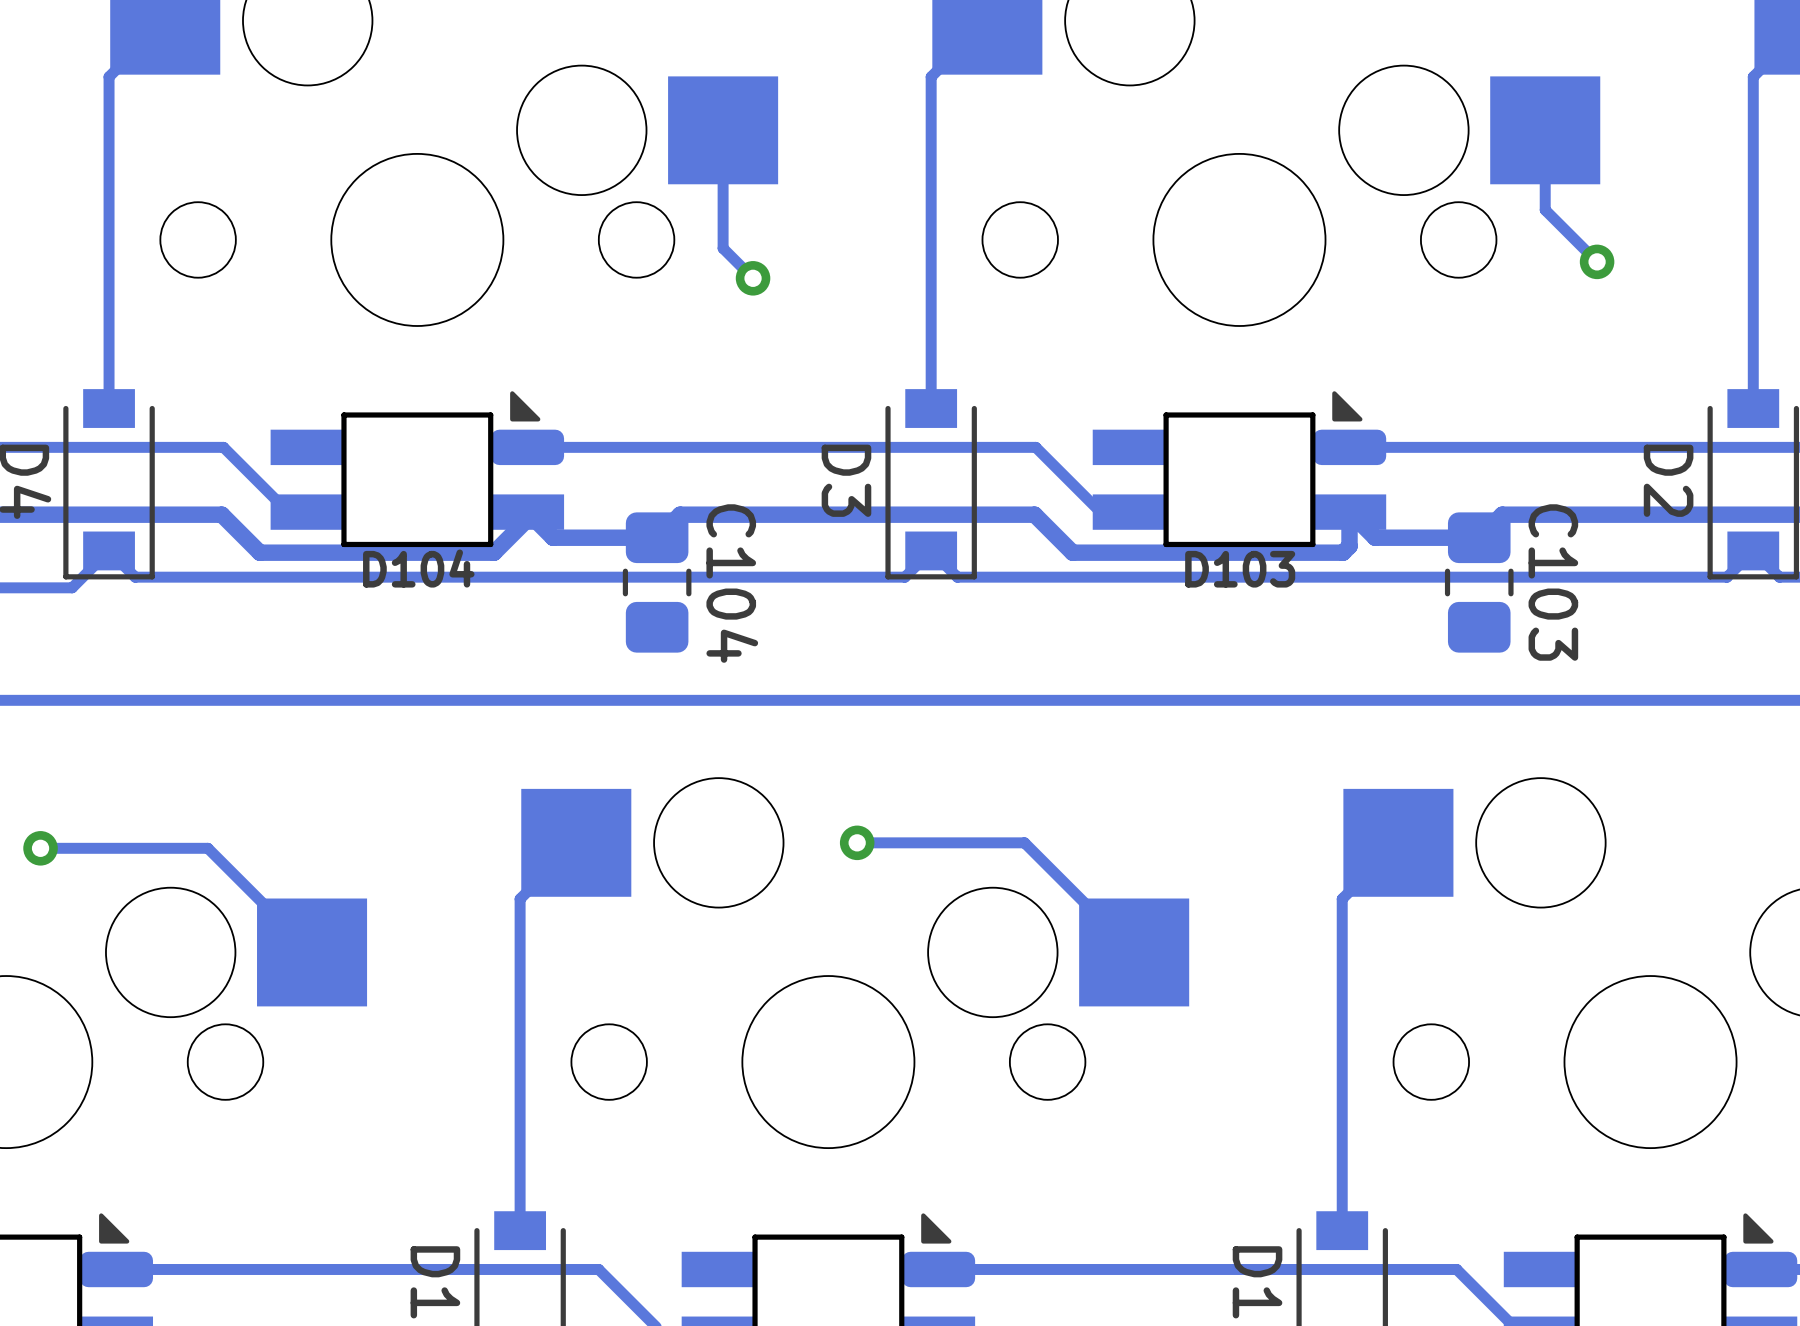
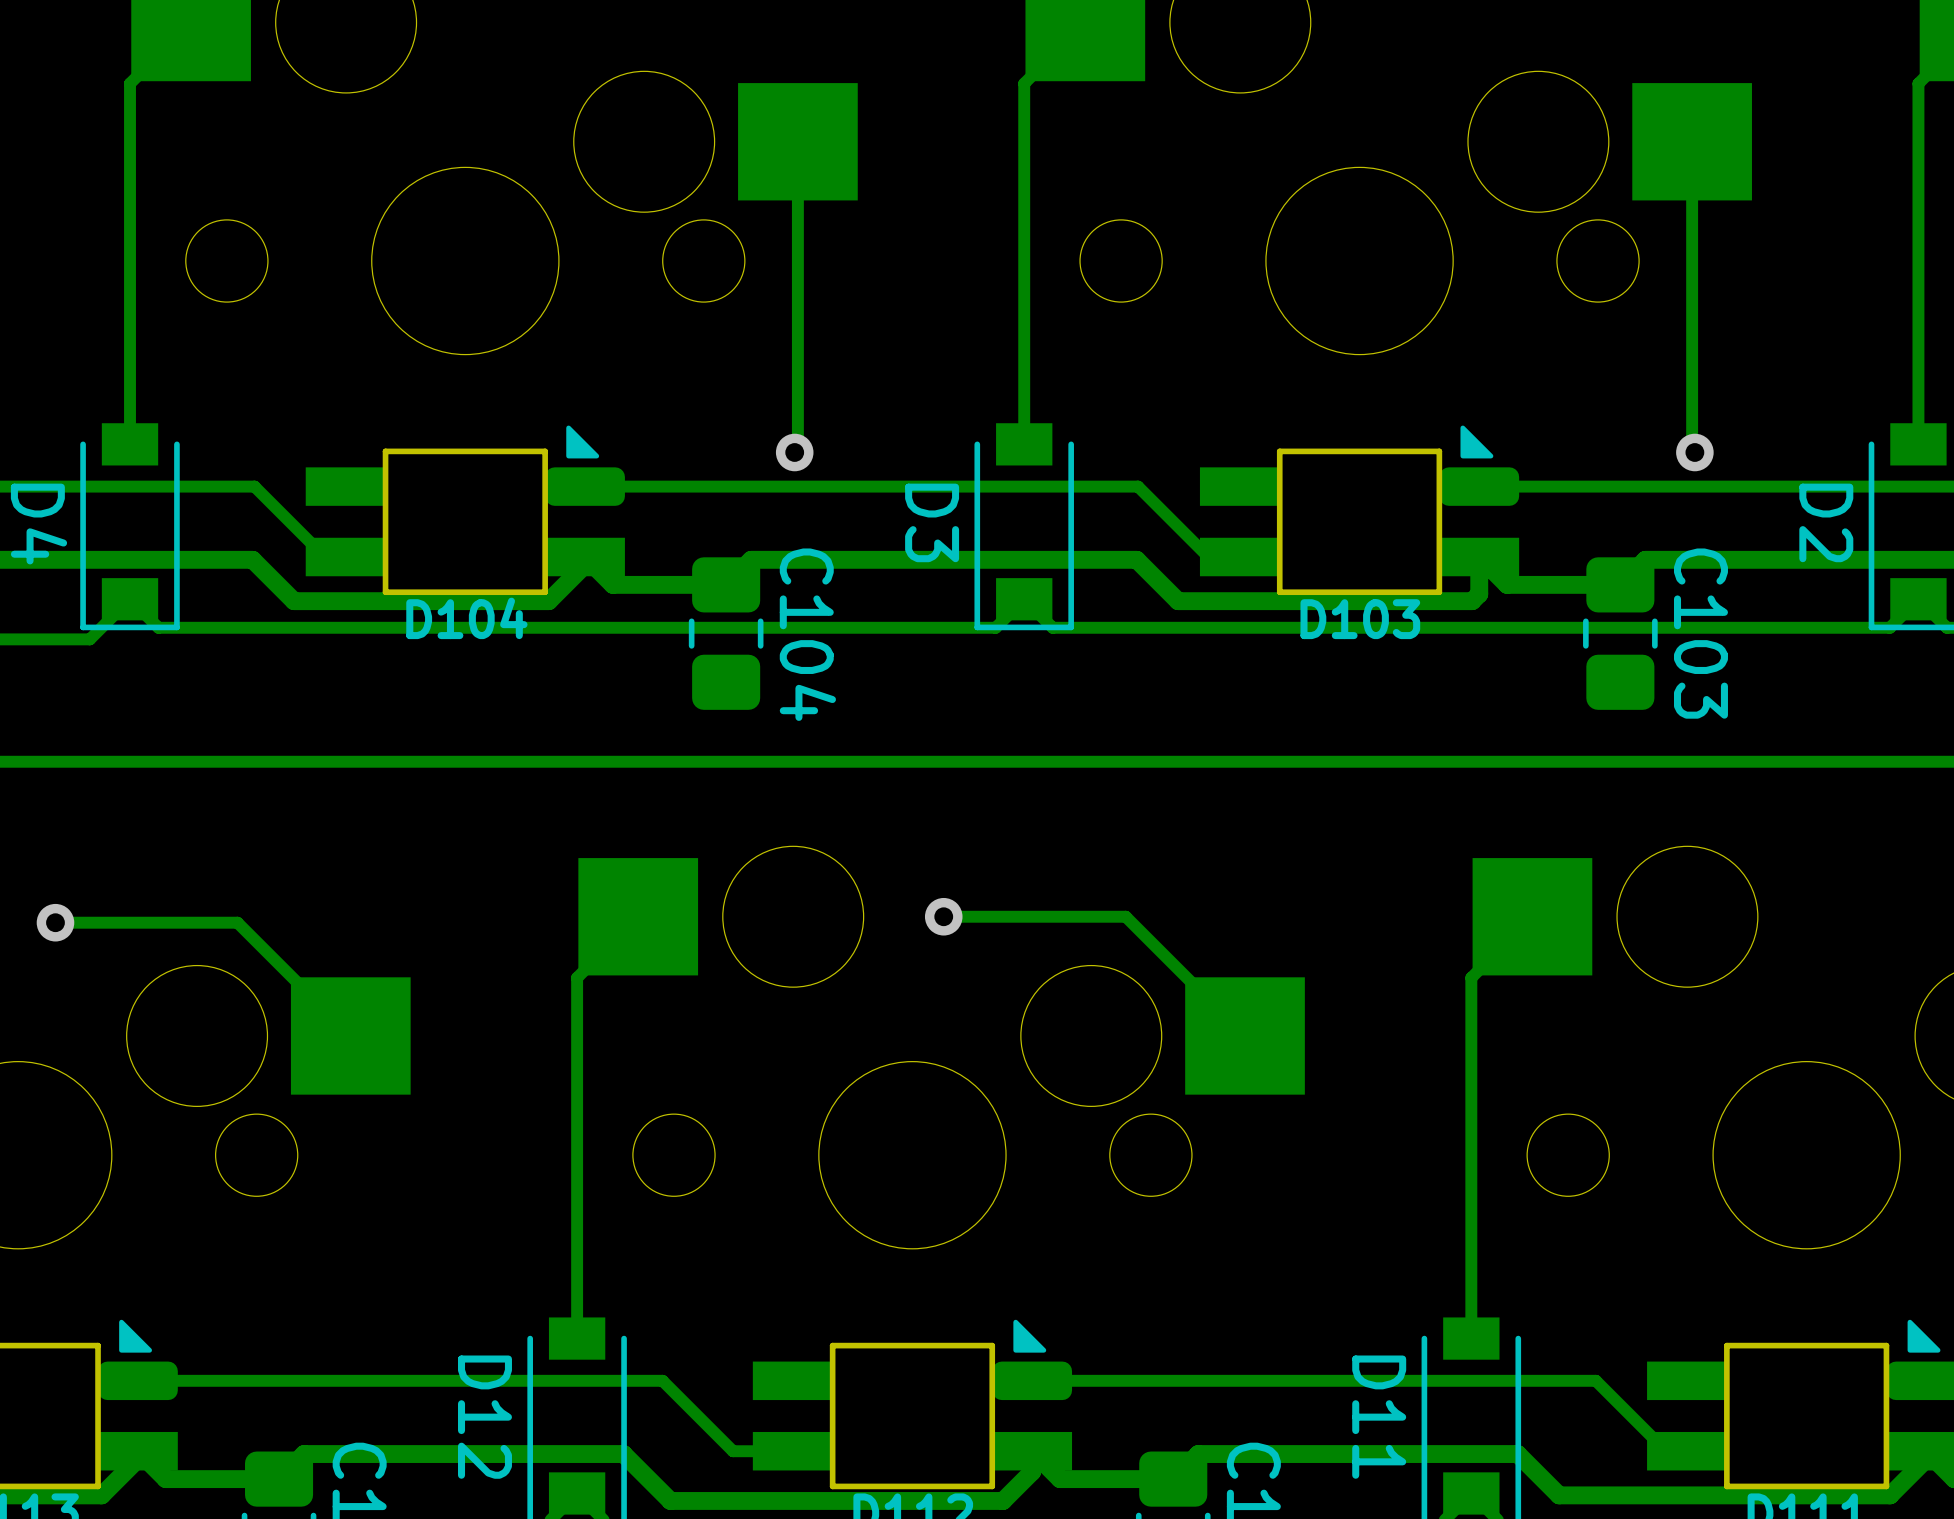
track: (1545, 210) (1597, 261) -> (1692, 228) (1692, 449) (1694, 452)
track: (723, 248) (753, 278) -> (797, 270) (797, 449) (794, 452)
via position: (1597, 261) -> (1694, 452)
via position: (753, 278) -> (794, 452)

